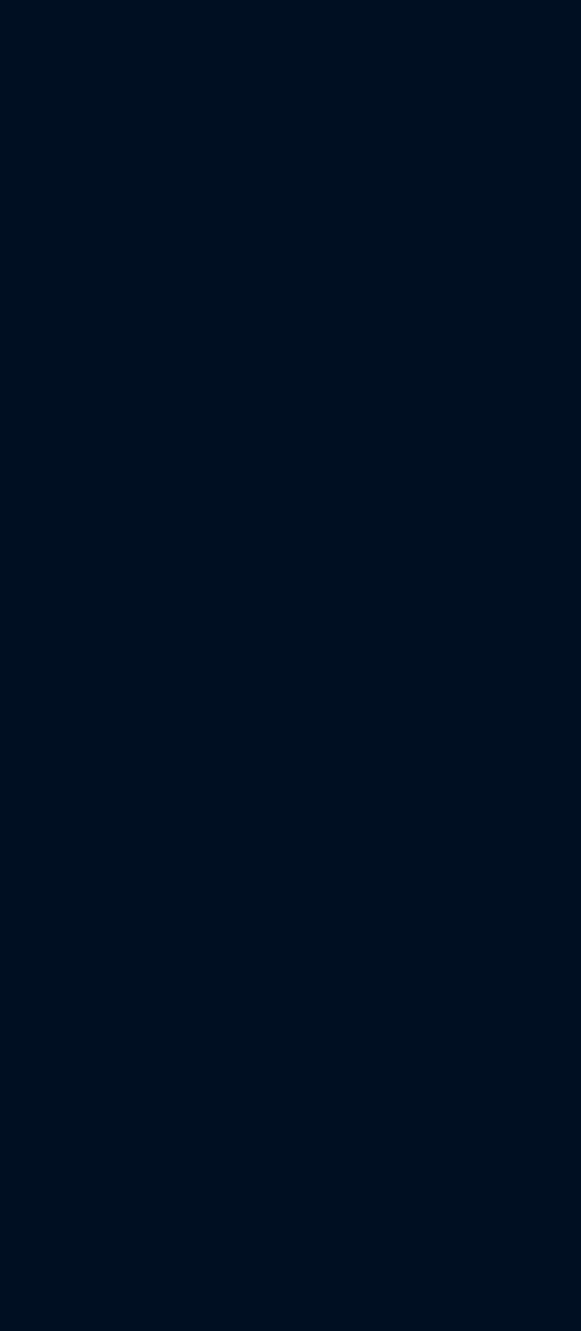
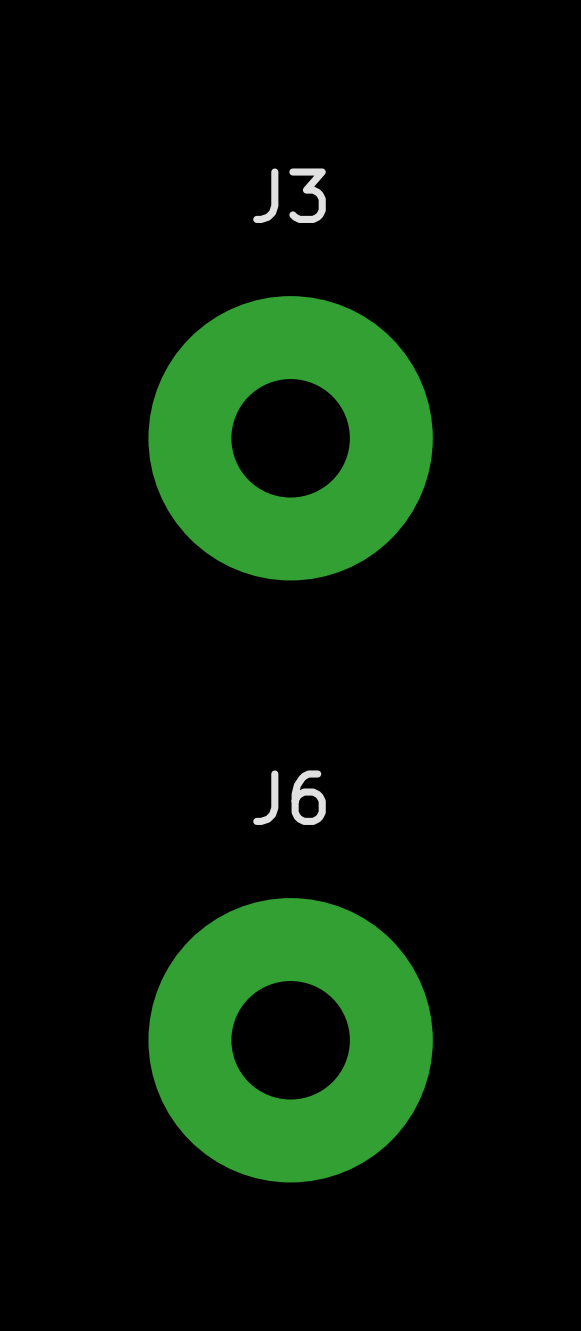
J3: none -> (290, 438)
J6: none -> (290, 1040)

